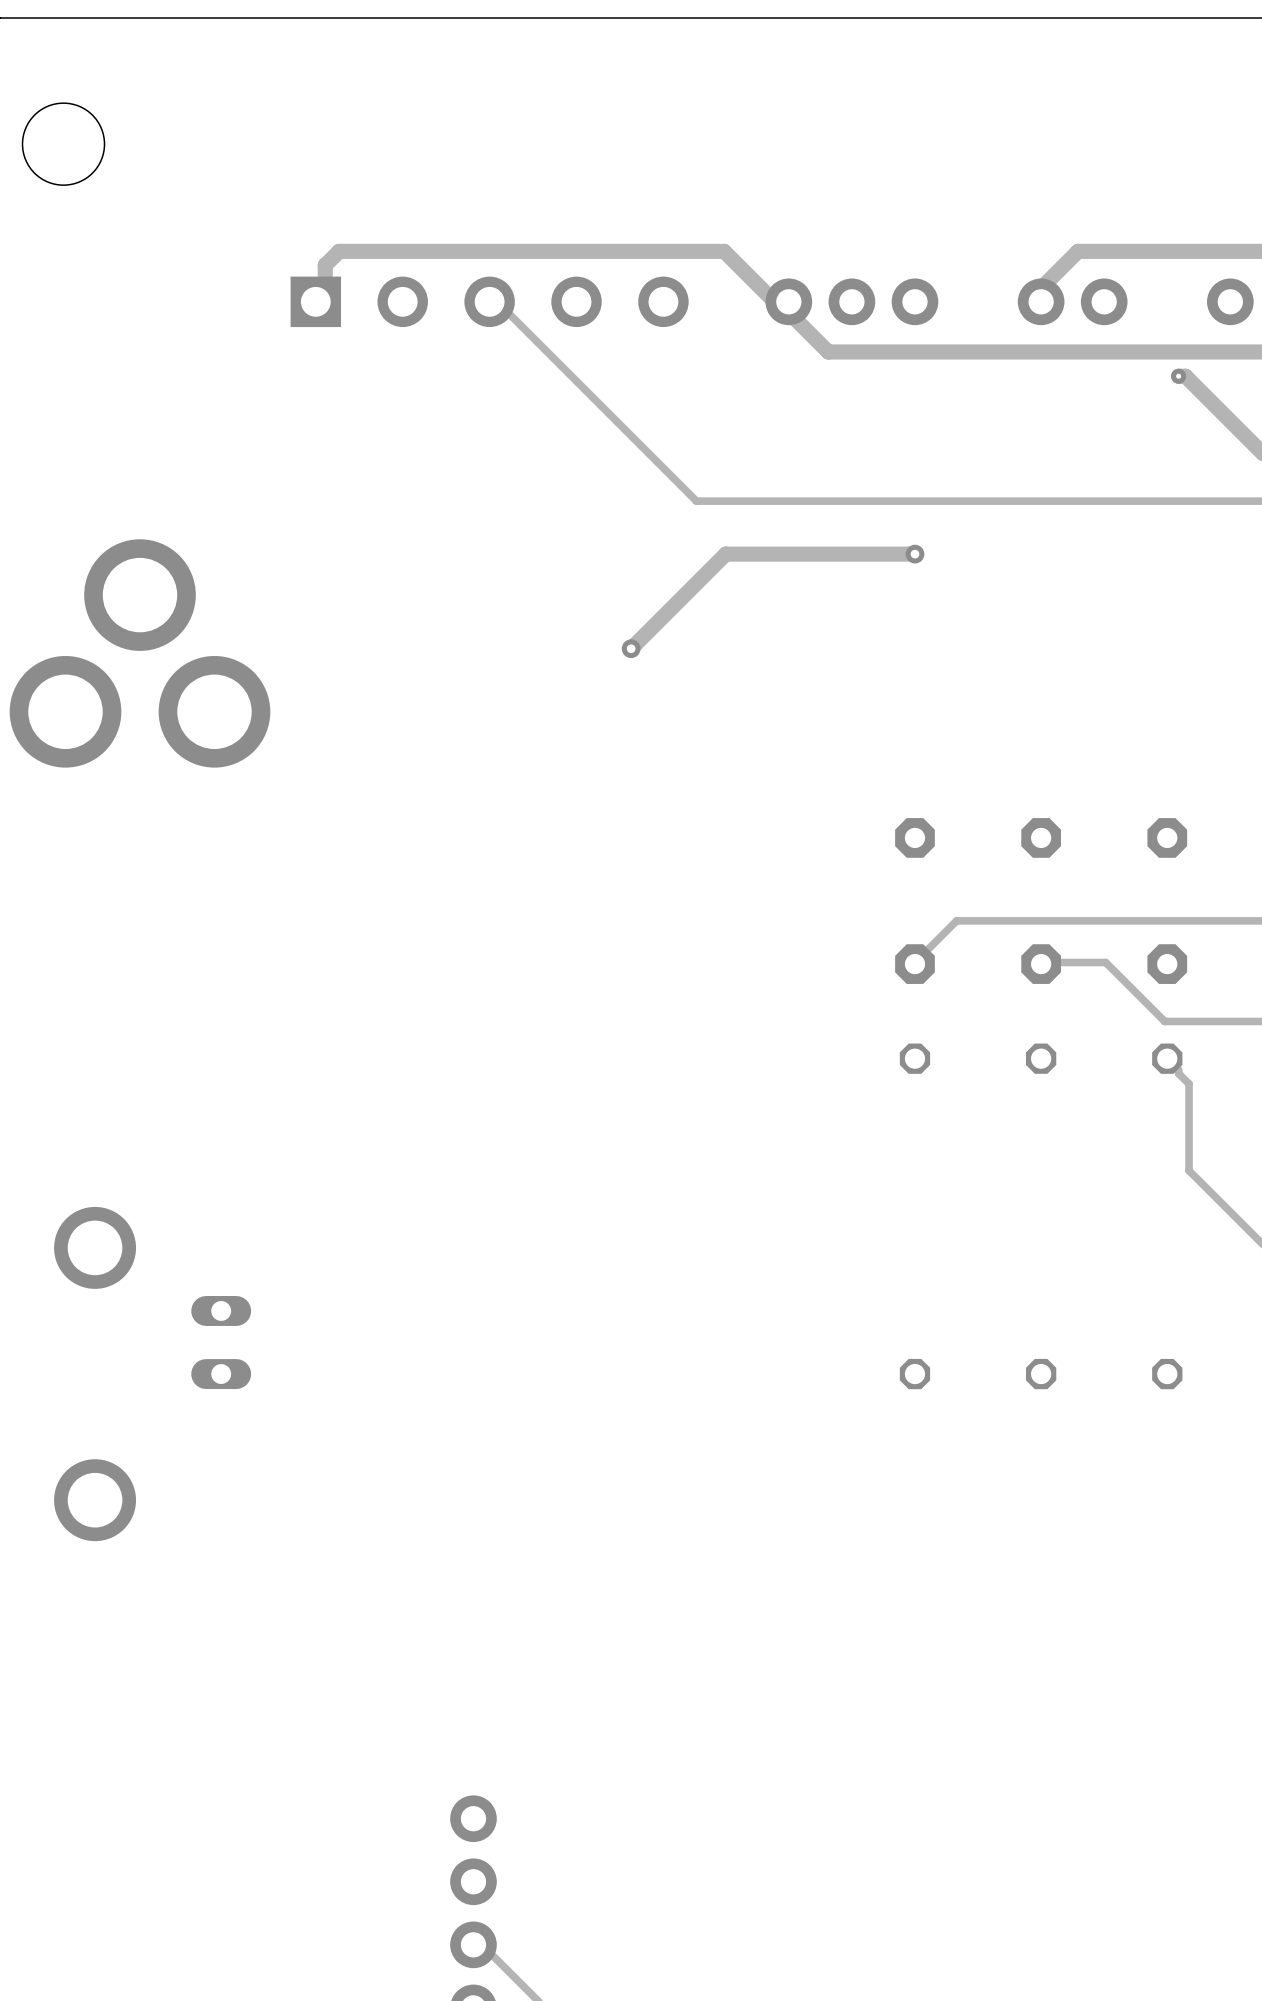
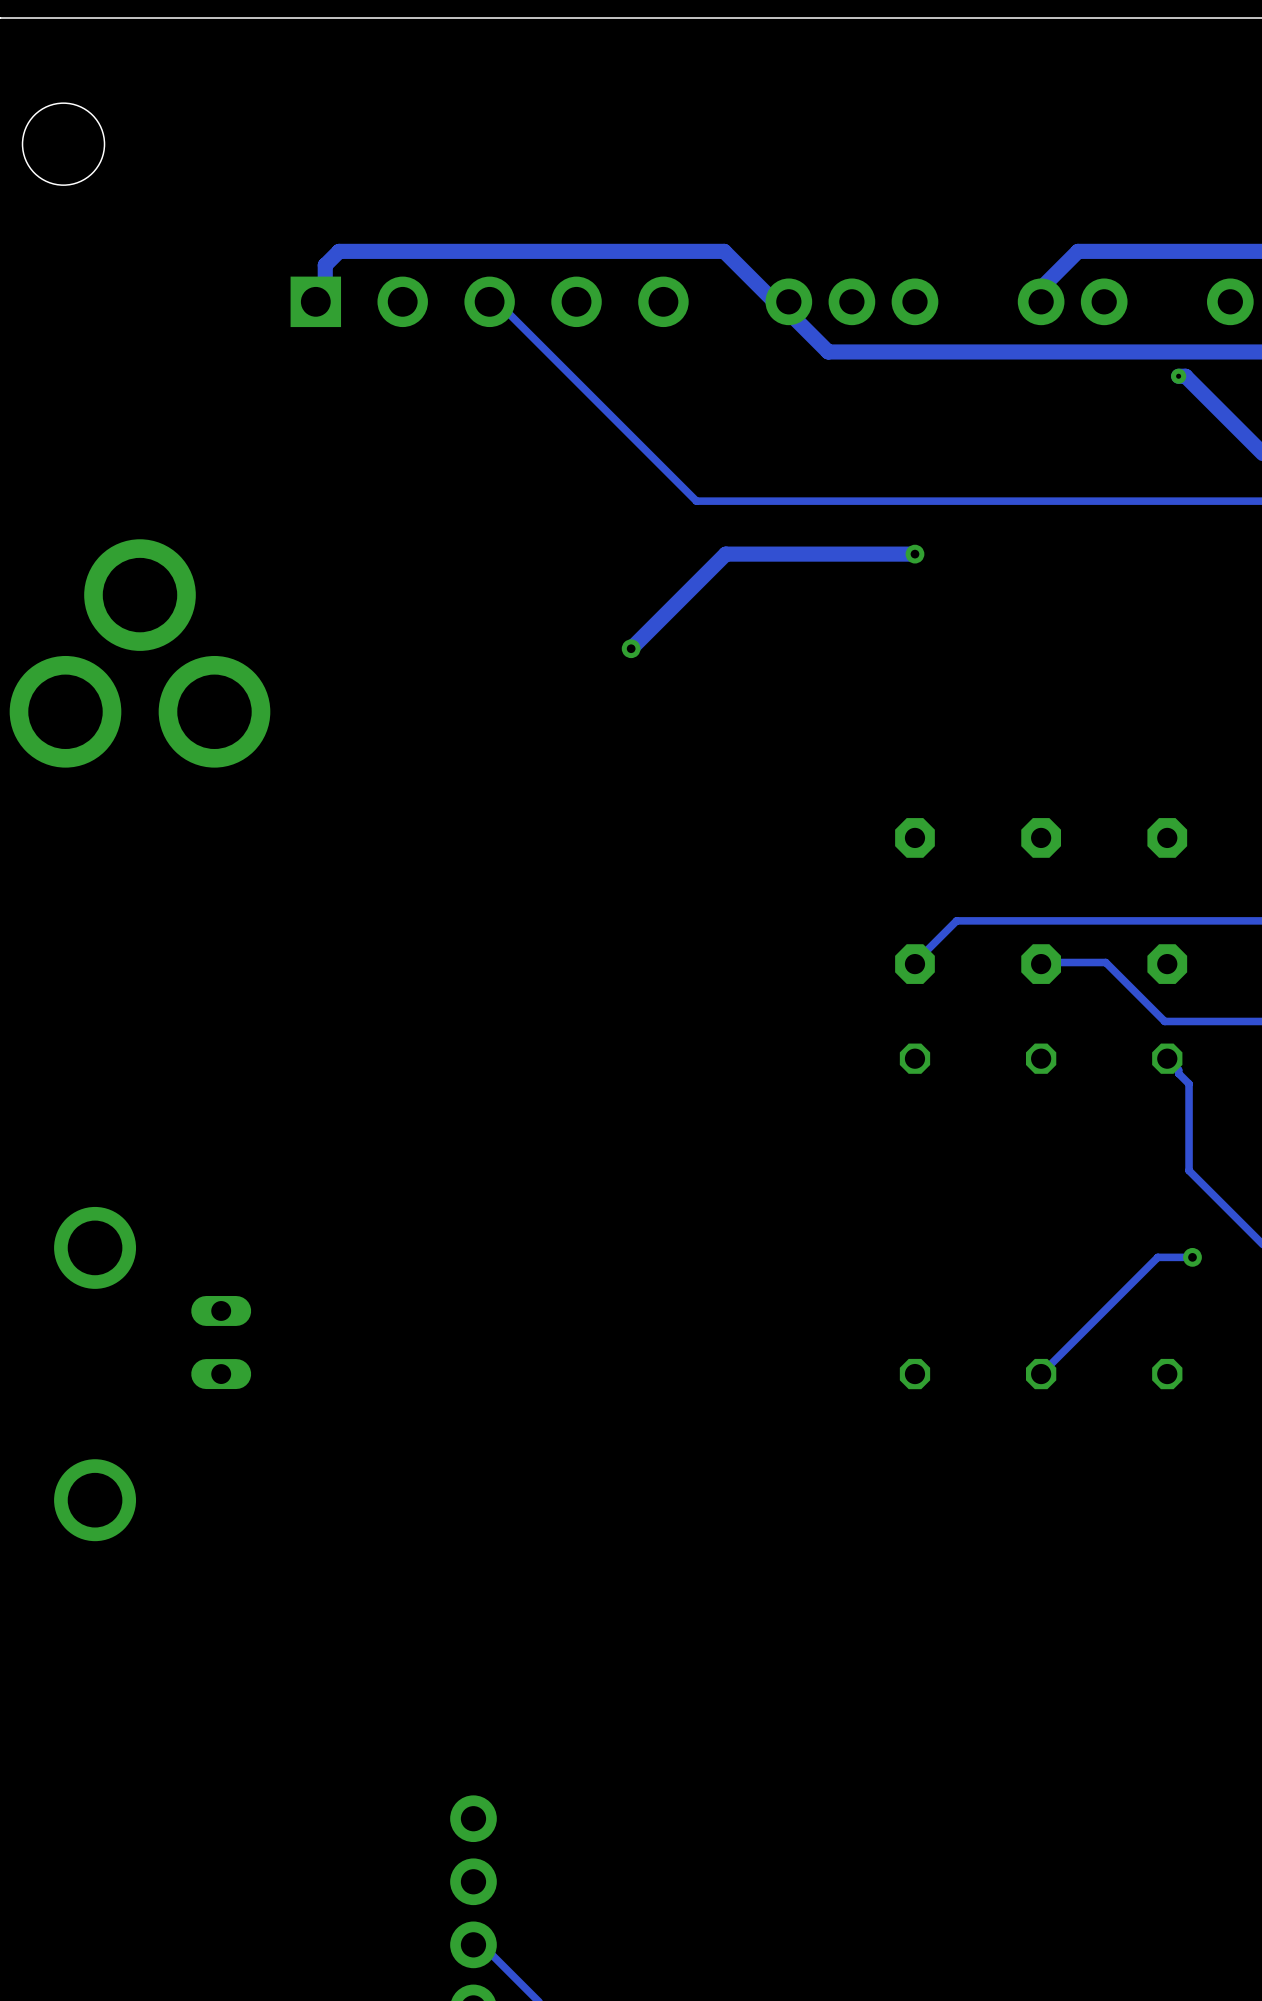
track: none -> (1192, 1257) (1157, 1257) (1041, 1374)
via: none -> (1192, 1257)

